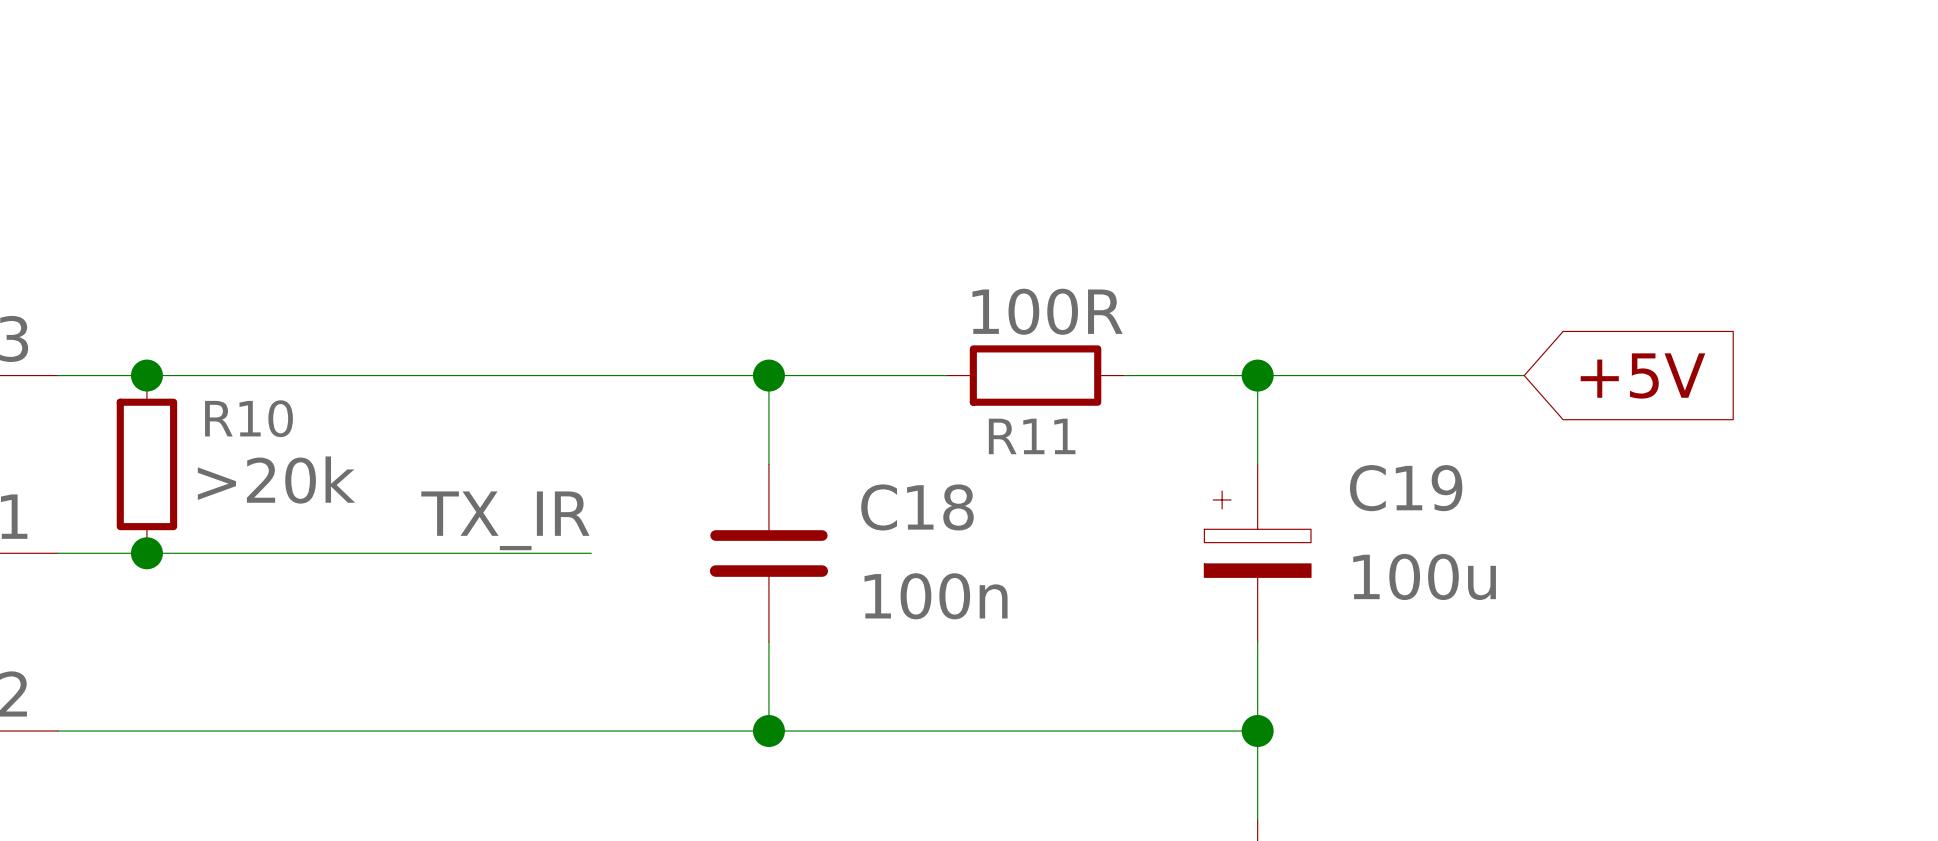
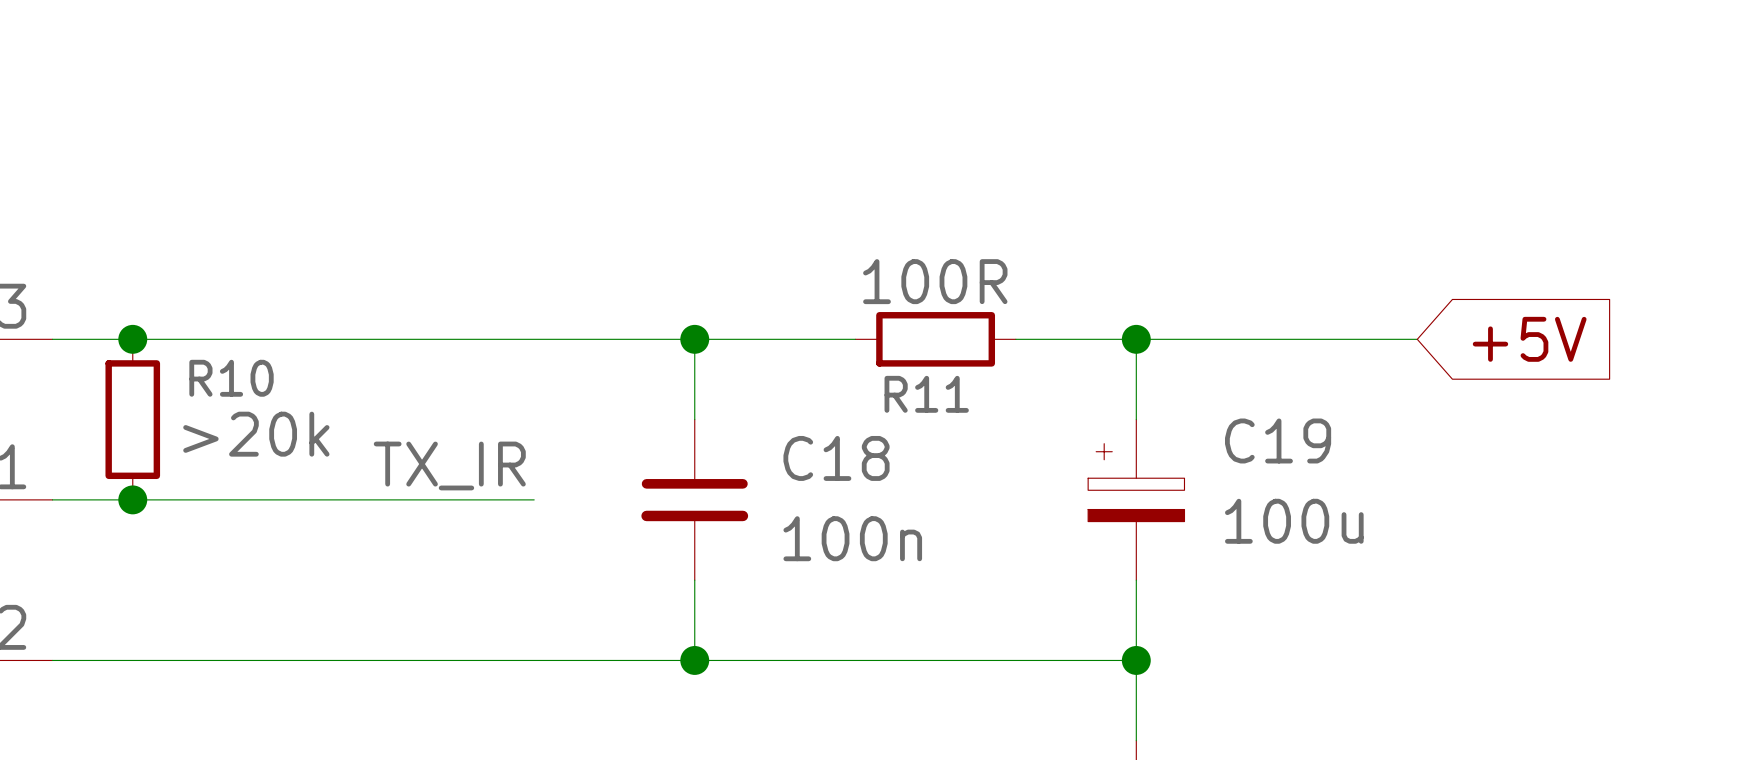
wire: none -> (1377, 339) (1417, 339)
global label position: +5V (1642, 376) -> +5V (1529, 339)

